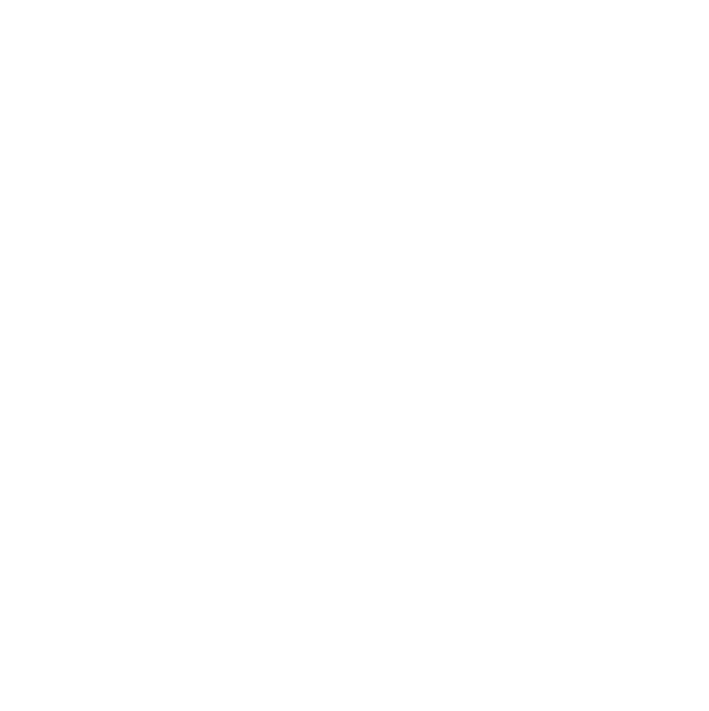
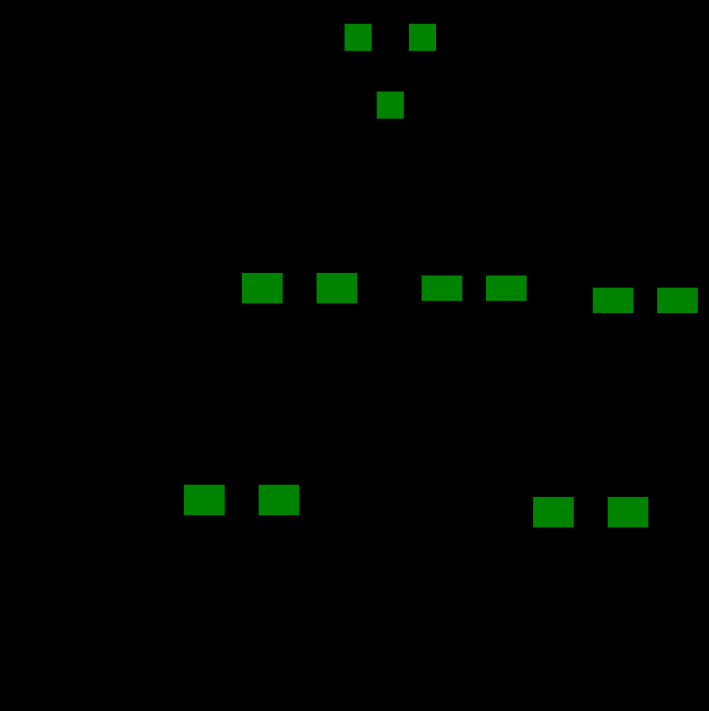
part: none -> (390, 71)
part: none -> (299, 288)
part: none -> (474, 288)
part: none -> (645, 300)
part: none -> (241, 499)
part: none -> (590, 512)

